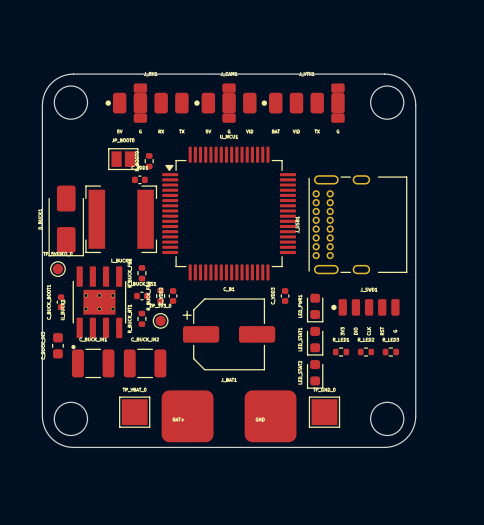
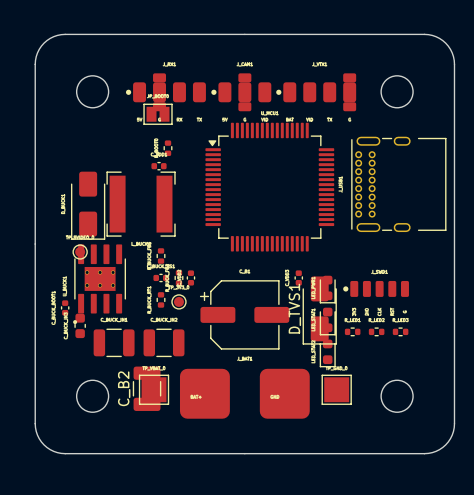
board edge: (73, 74) (384, 74) (396, 76) (406, 83) (413, 93) (415, 105) (415, 416) (413, 428) (406, 438) (396, 445) (384, 447) (73, 447) (61, 445) (51, 438) (44, 428) (42, 416) (42, 105) (44, 93) (51, 83) (61, 76) (73, 74) -> (65, 34) (53, 36) (44, 43) (37, 52) (35, 64) (35, 423) (37, 435) (44, 444) (53, 451) (65, 453) (424, 453) (436, 451) (445, 444) (452, 435) (454, 423) (454, 64) (452, 52) (445, 43) (436, 36) (424, 34) (65, 34)
part position: (123, 159) -> (158, 114)
part position: (229, 213) -> (269, 187)
part position: (357, 224) -> (398, 184)
part position: (61, 302) -> (65, 307)
part position: (98, 307) -> (99, 284)
D_TVS1: none -> (319, 310)
C_B2: none -> (147, 388)

